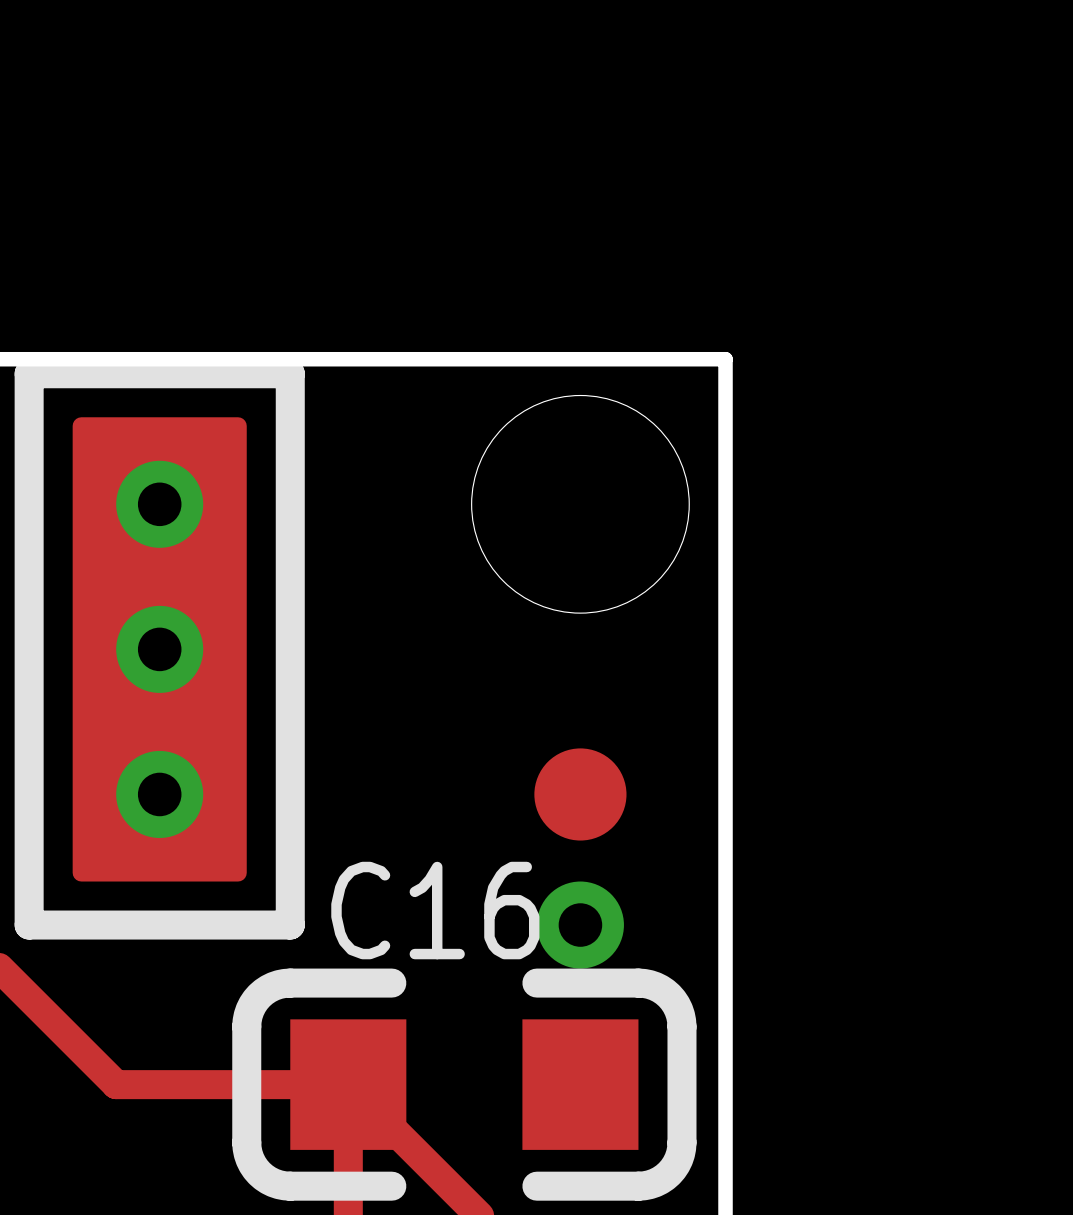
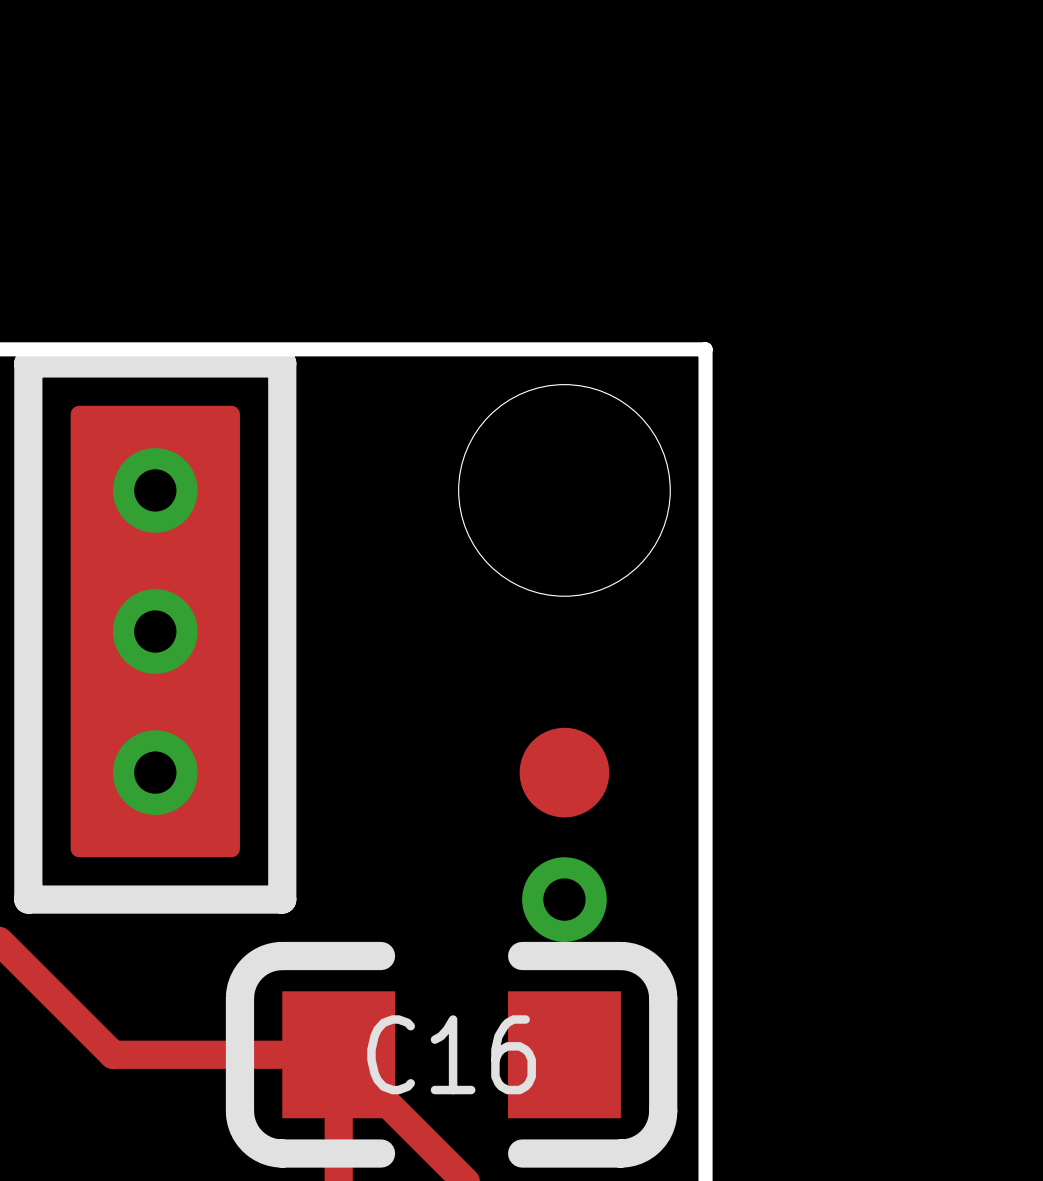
C16 name position: C16 (435, 910) -> C16 (451, 1054)

